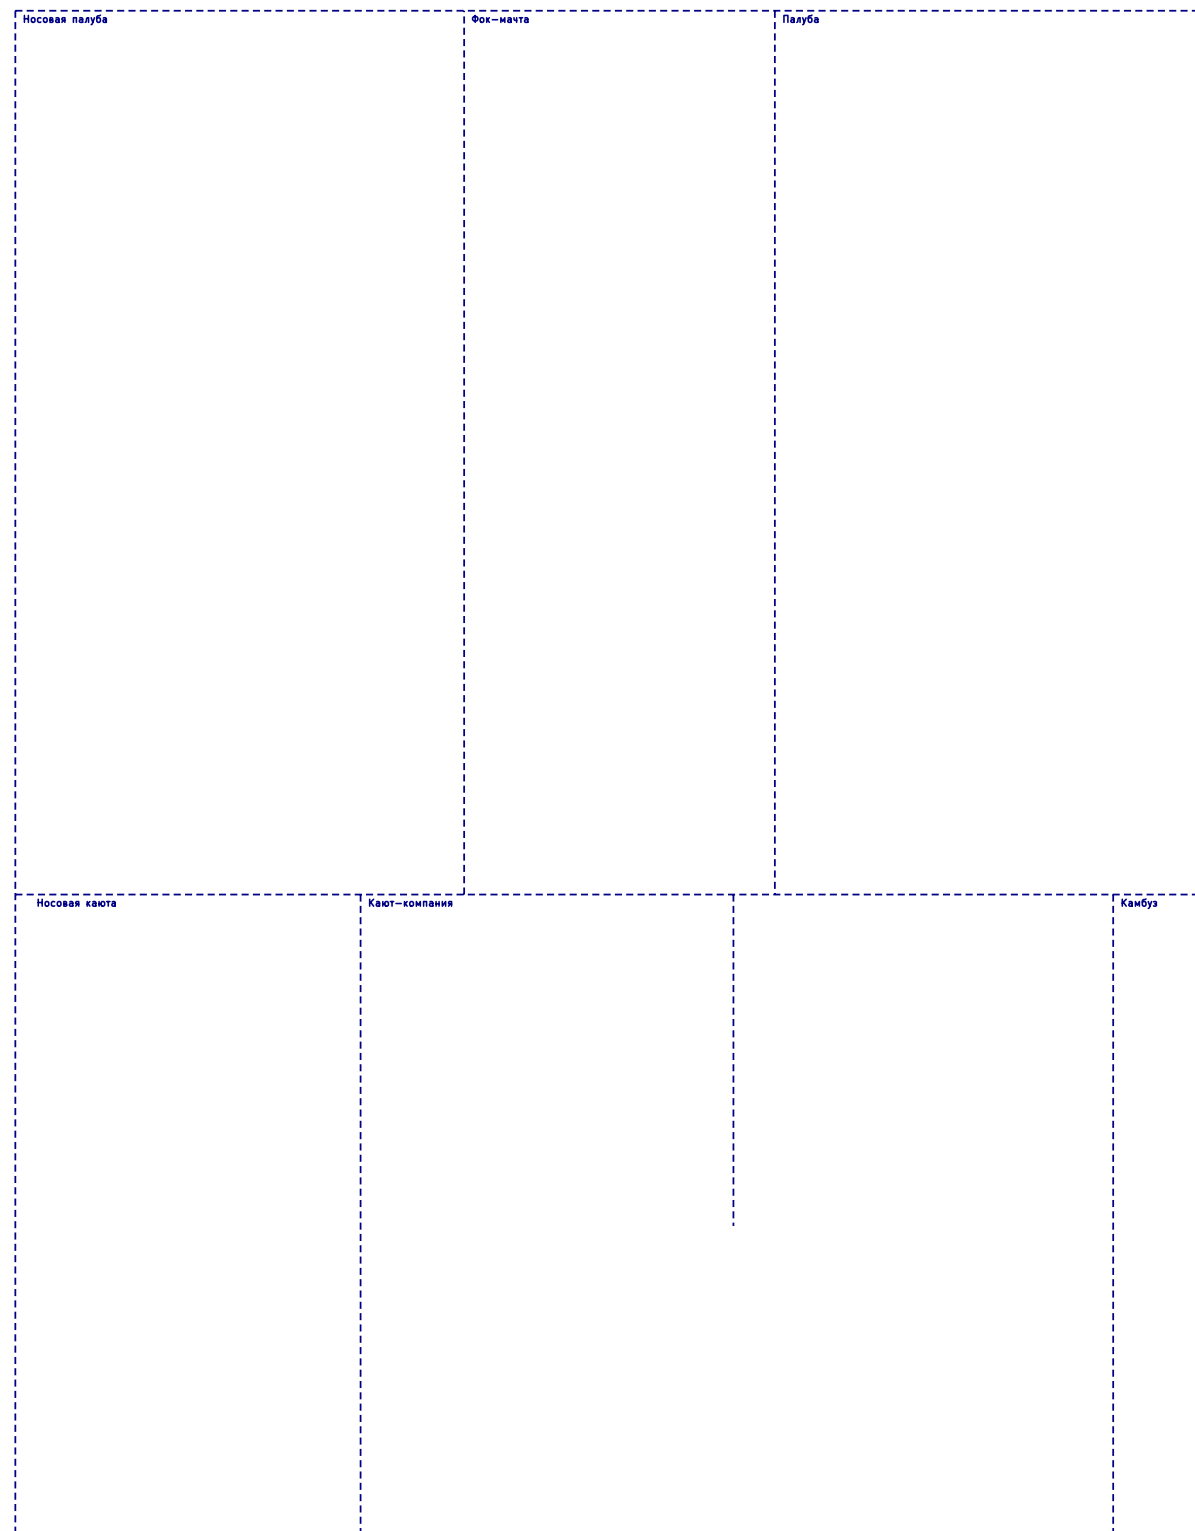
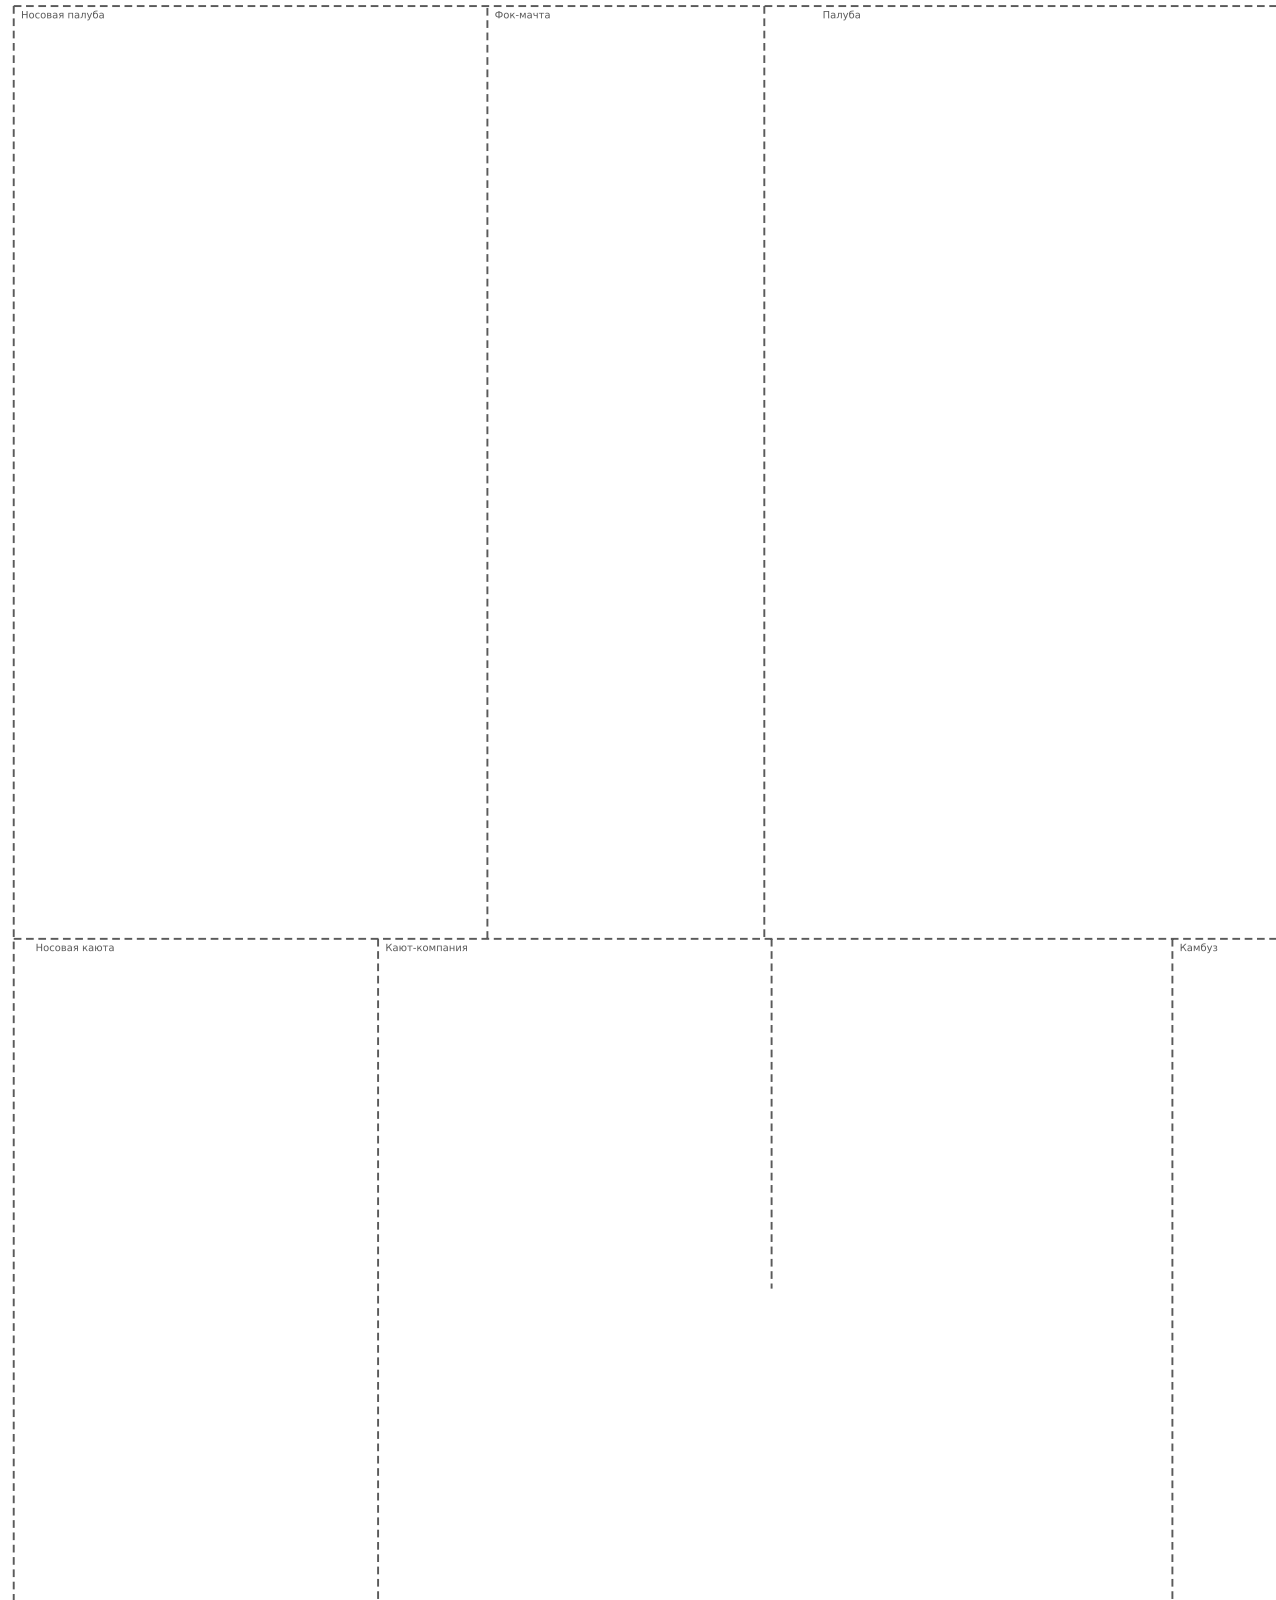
line: (774, 10) (774, 894) -> (764, 6) (764, 938)

